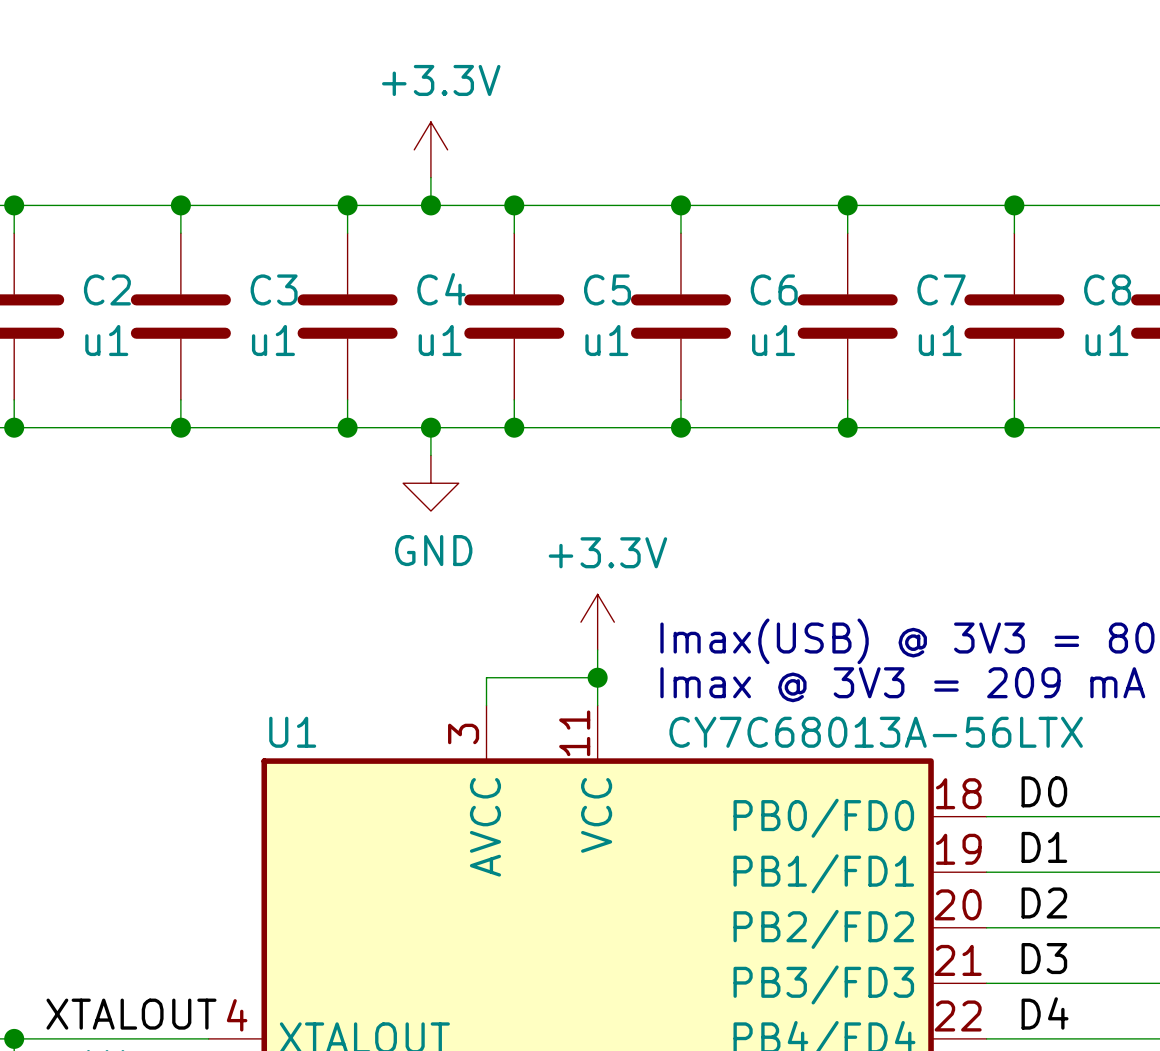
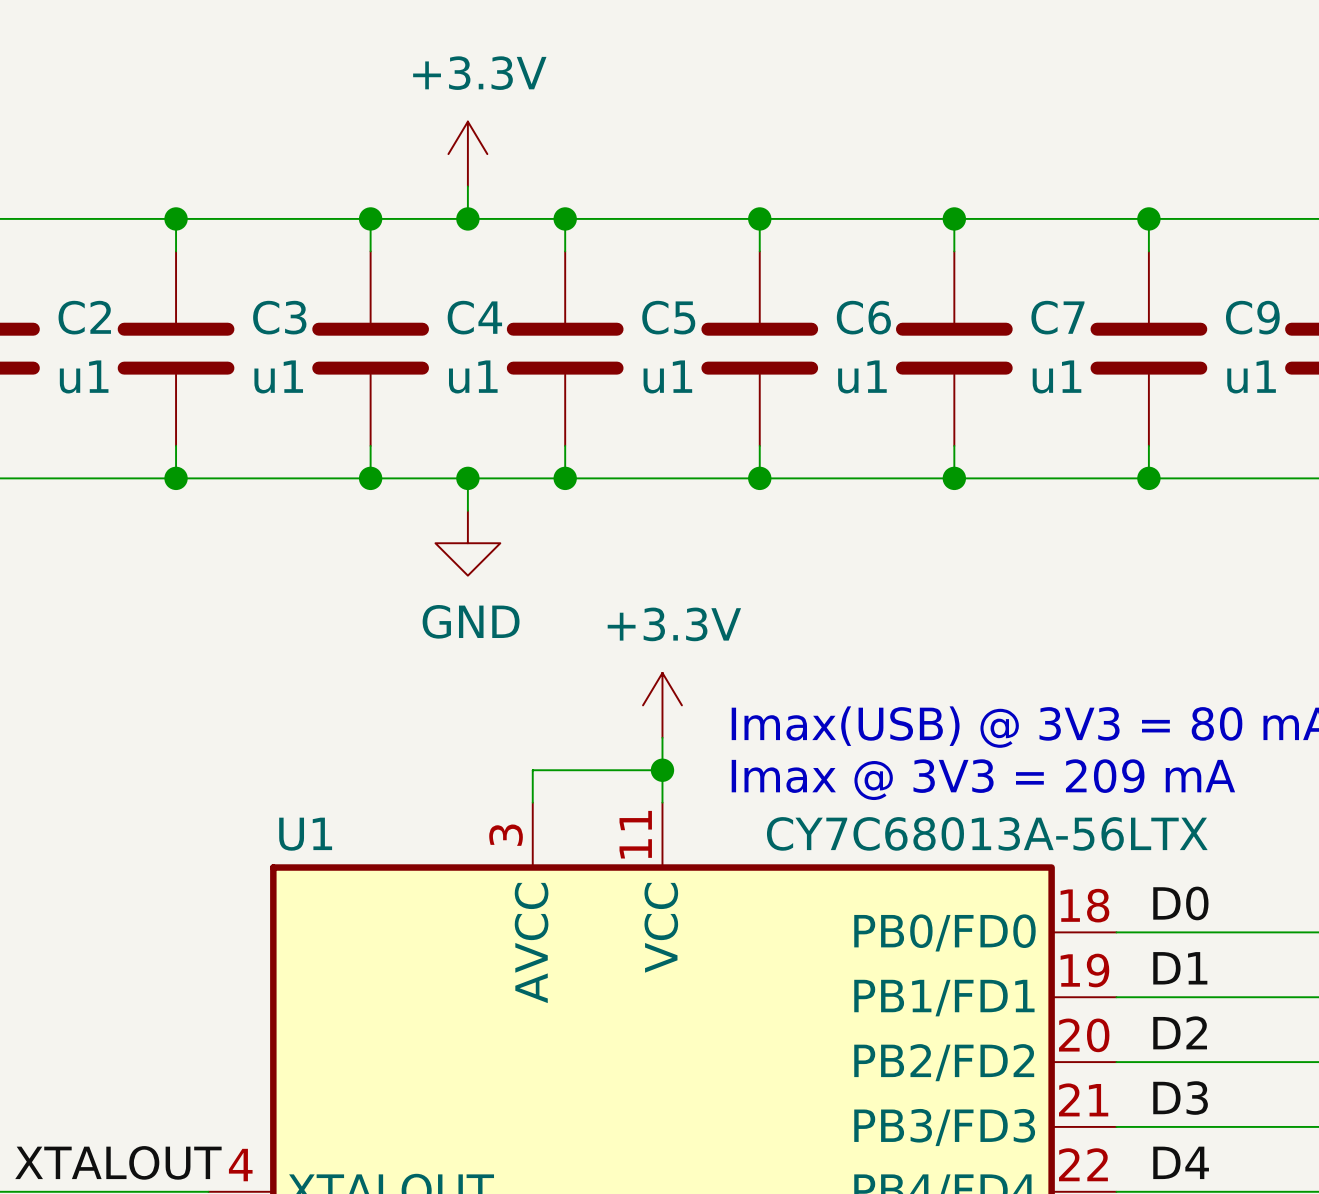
C8 name: C8 (1107, 289) -> C9 (1252, 317)

